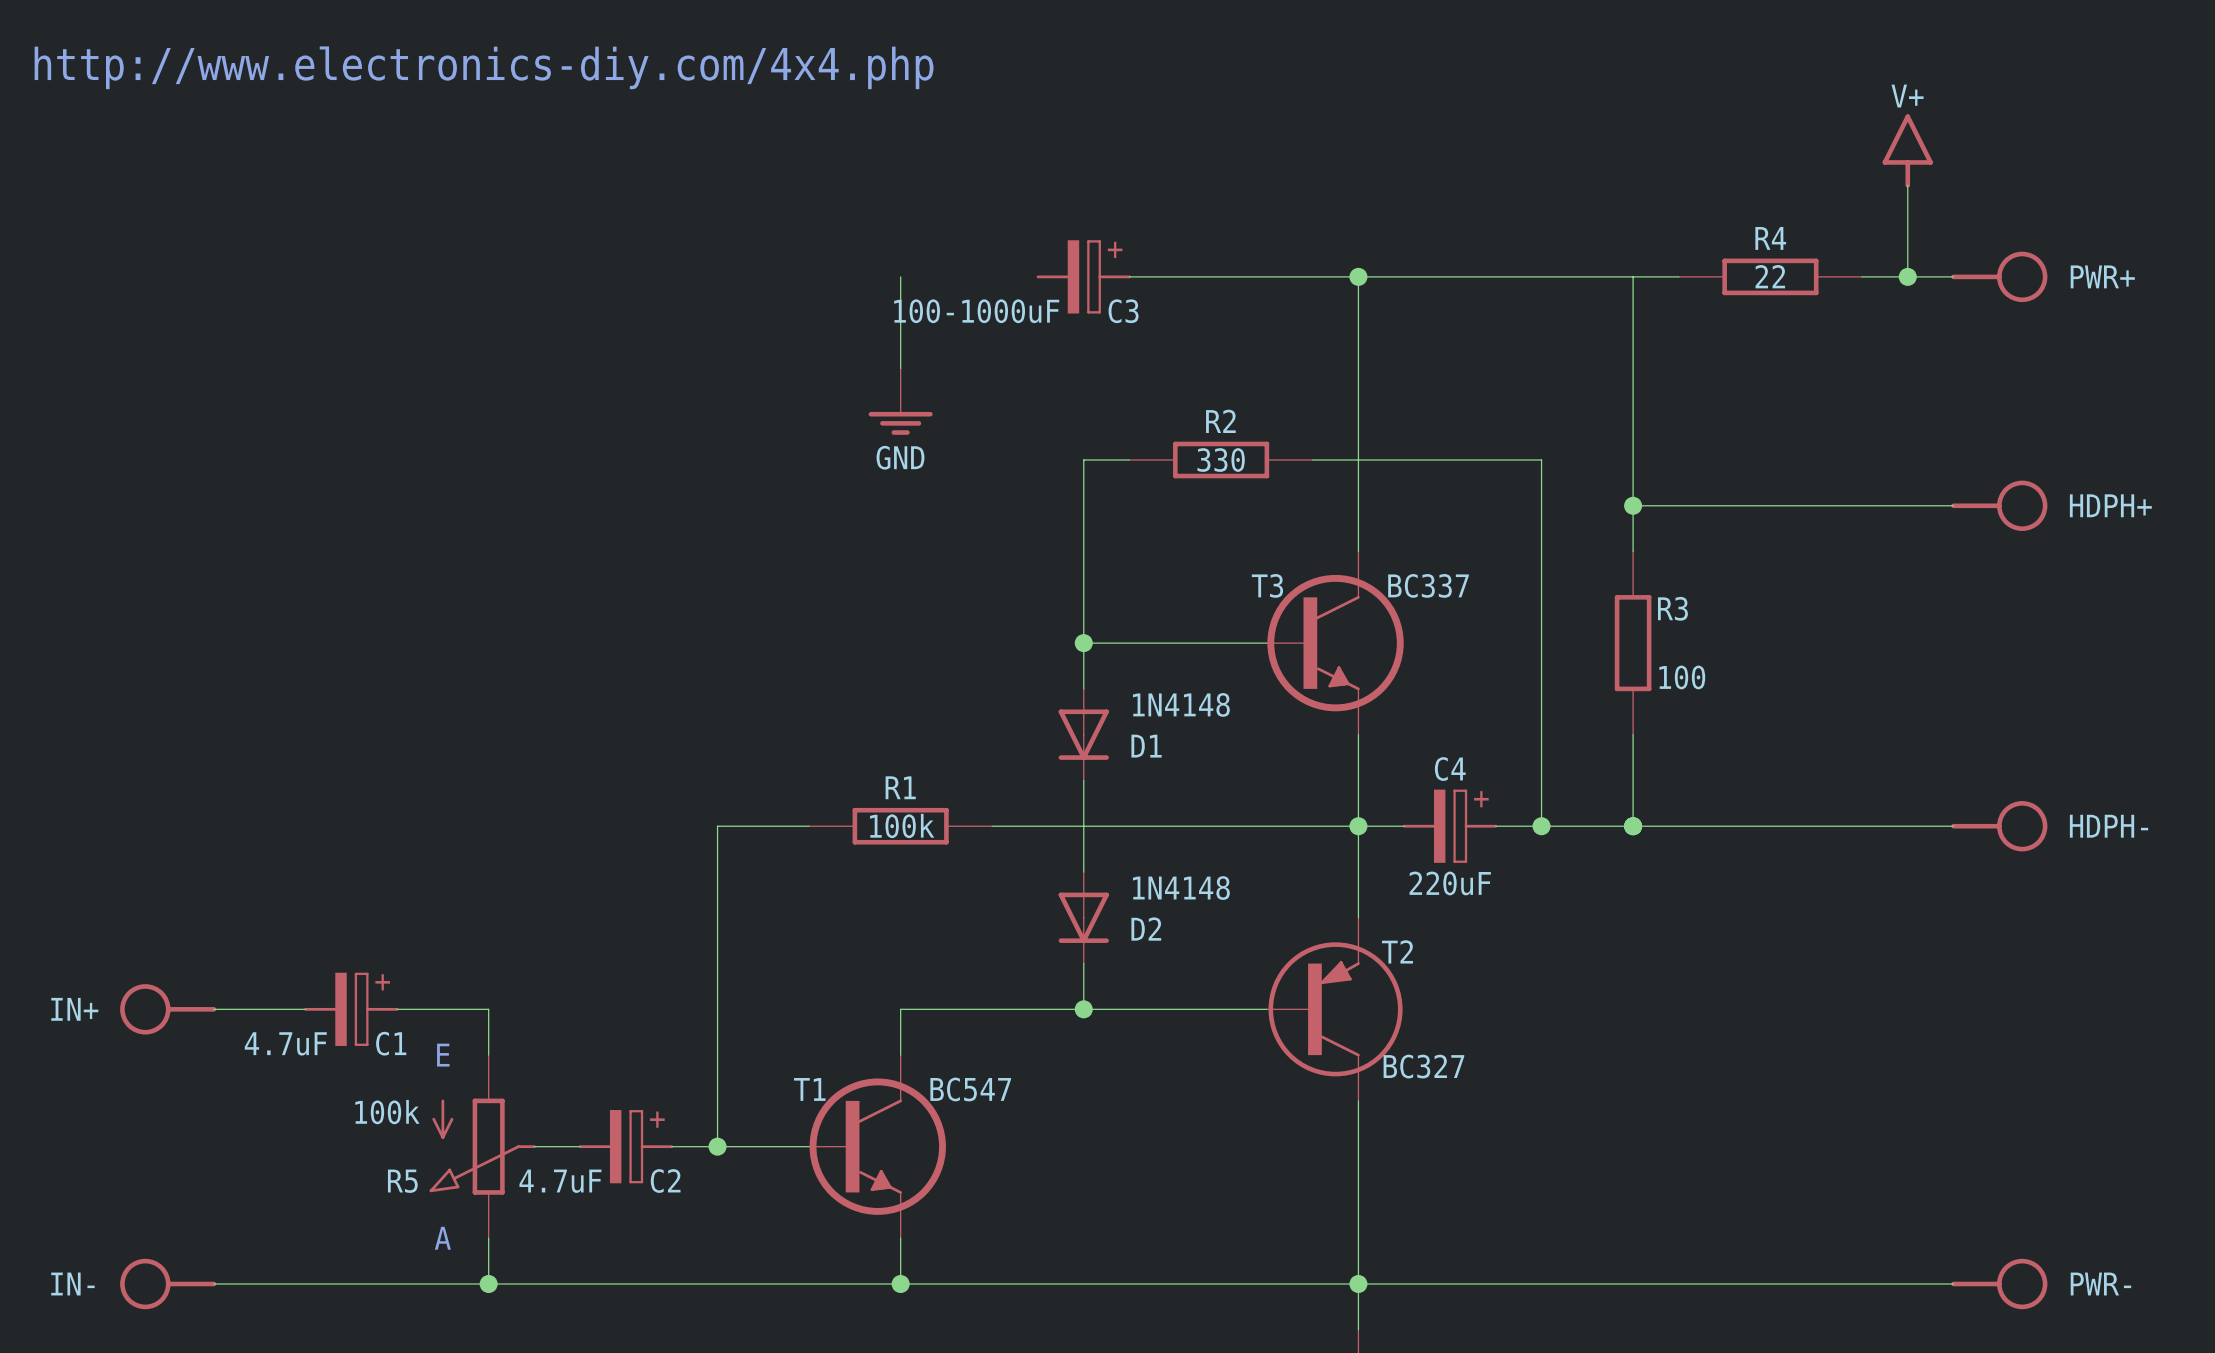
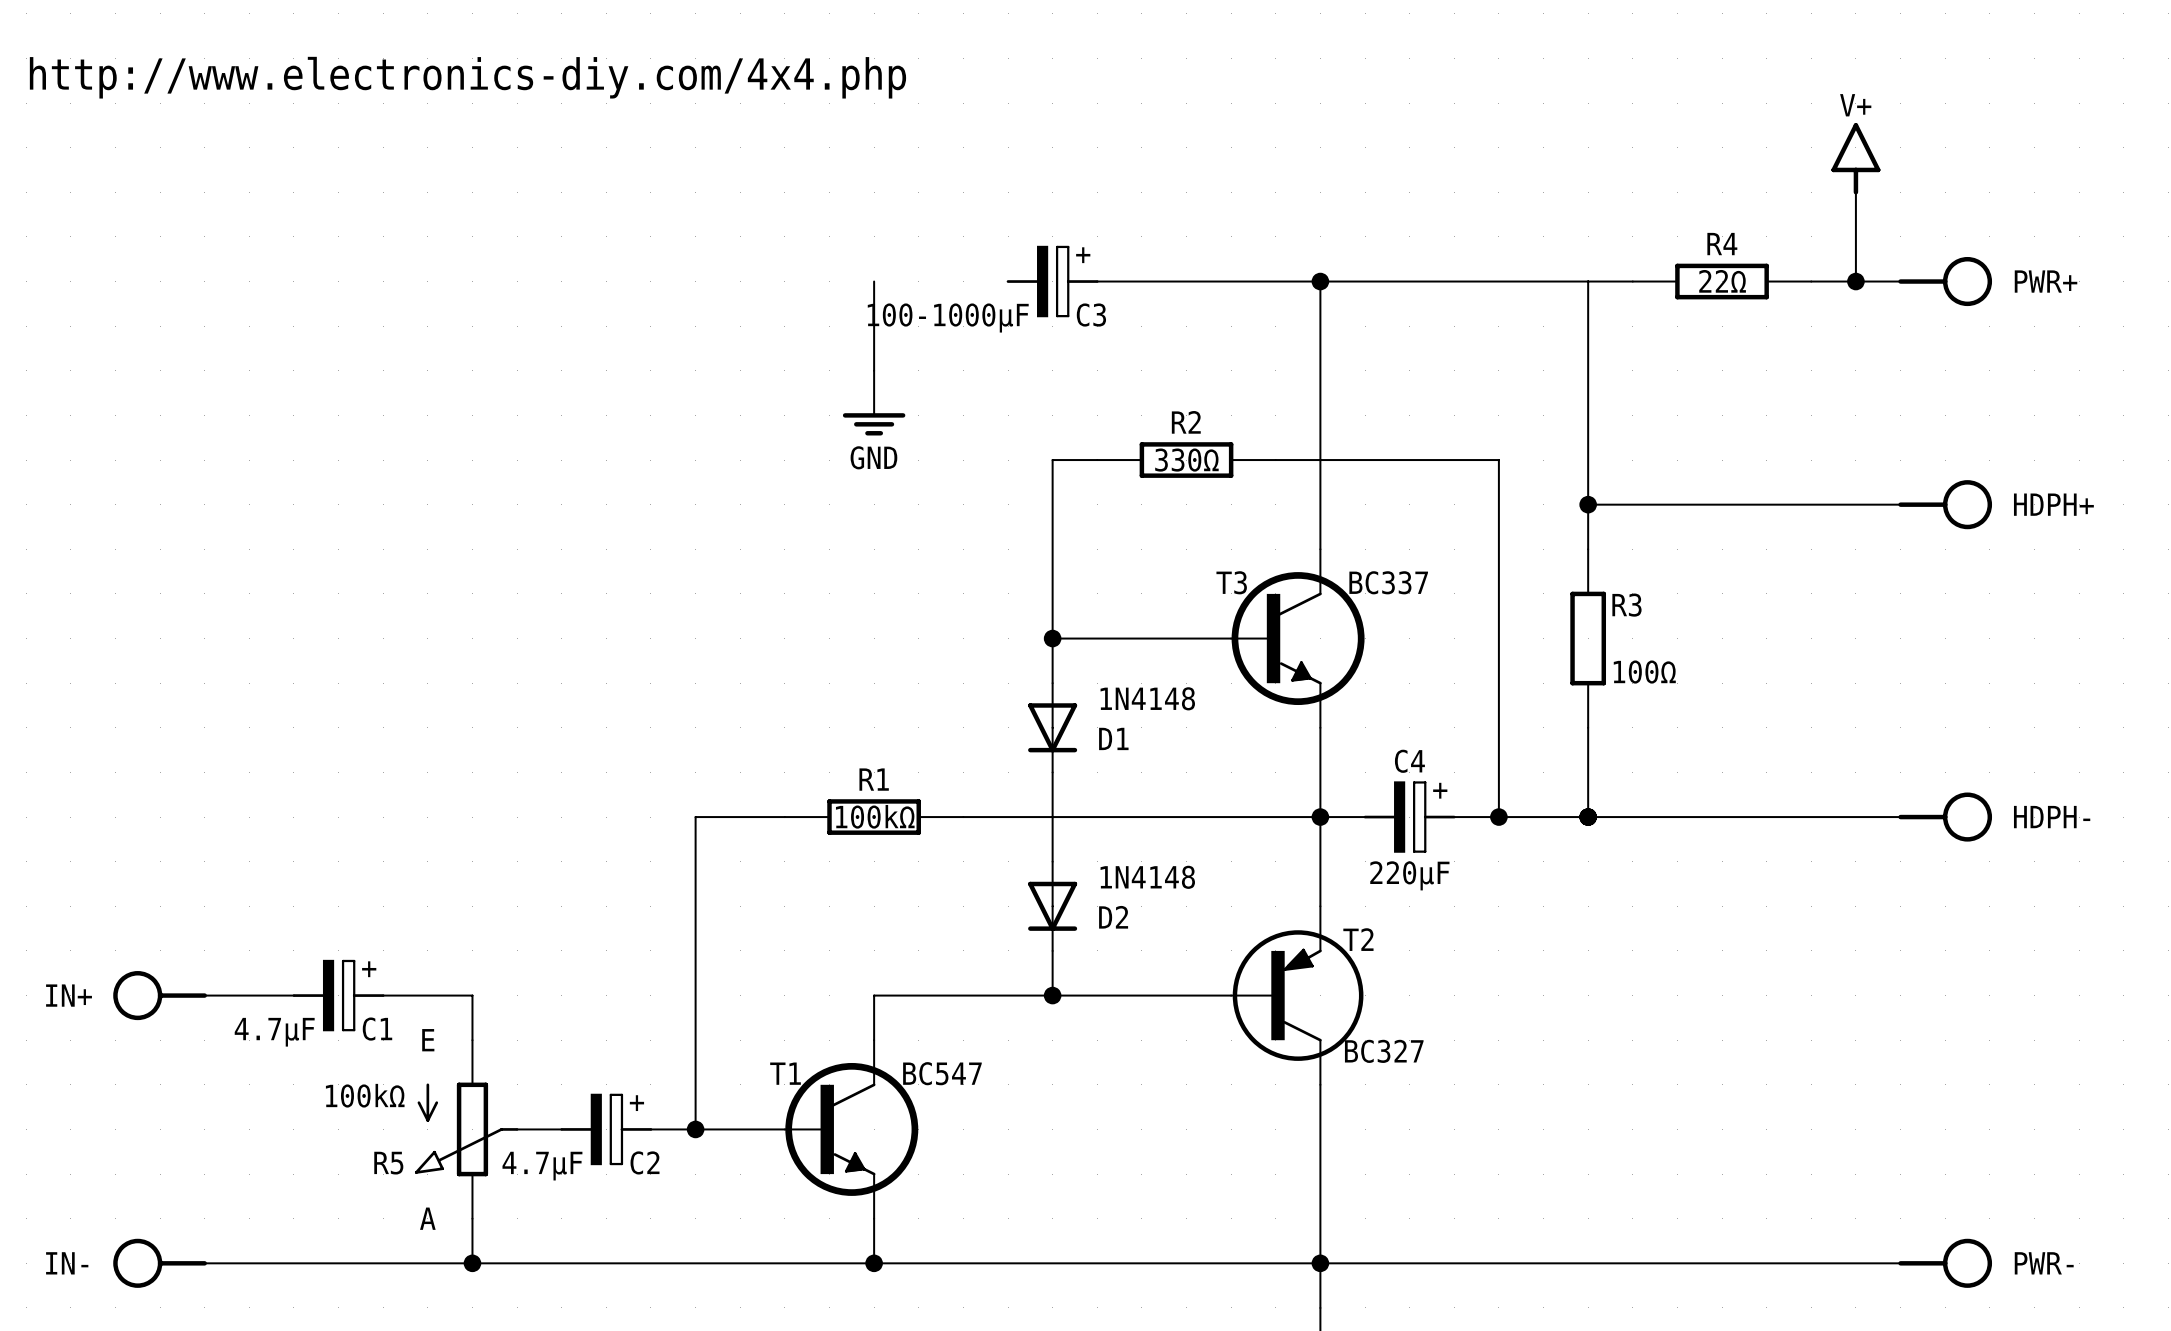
R4 value: 22 (1770, 276) -> 22Ω (1722, 281)
C3 value: 100-1000uF (976, 311) -> 100-1000μF (948, 317)
R2 value: 330 (1221, 460) -> 330Ω (1186, 460)
R3 value: 100 (1682, 677) -> 100Ω (1644, 672)
R1 value: 100k (902, 825) -> 100kΩ (875, 816)
C4 value: 220uF (1450, 883) -> 220μF (1409, 875)
C1 value: 4.7uF (285, 1043) -> 4.7μF (274, 1032)
R5 value: 100k (387, 1112) -> 100kΩ (365, 1095)
C2 value: 4.7uF (560, 1181) -> 4.7μF (542, 1166)

